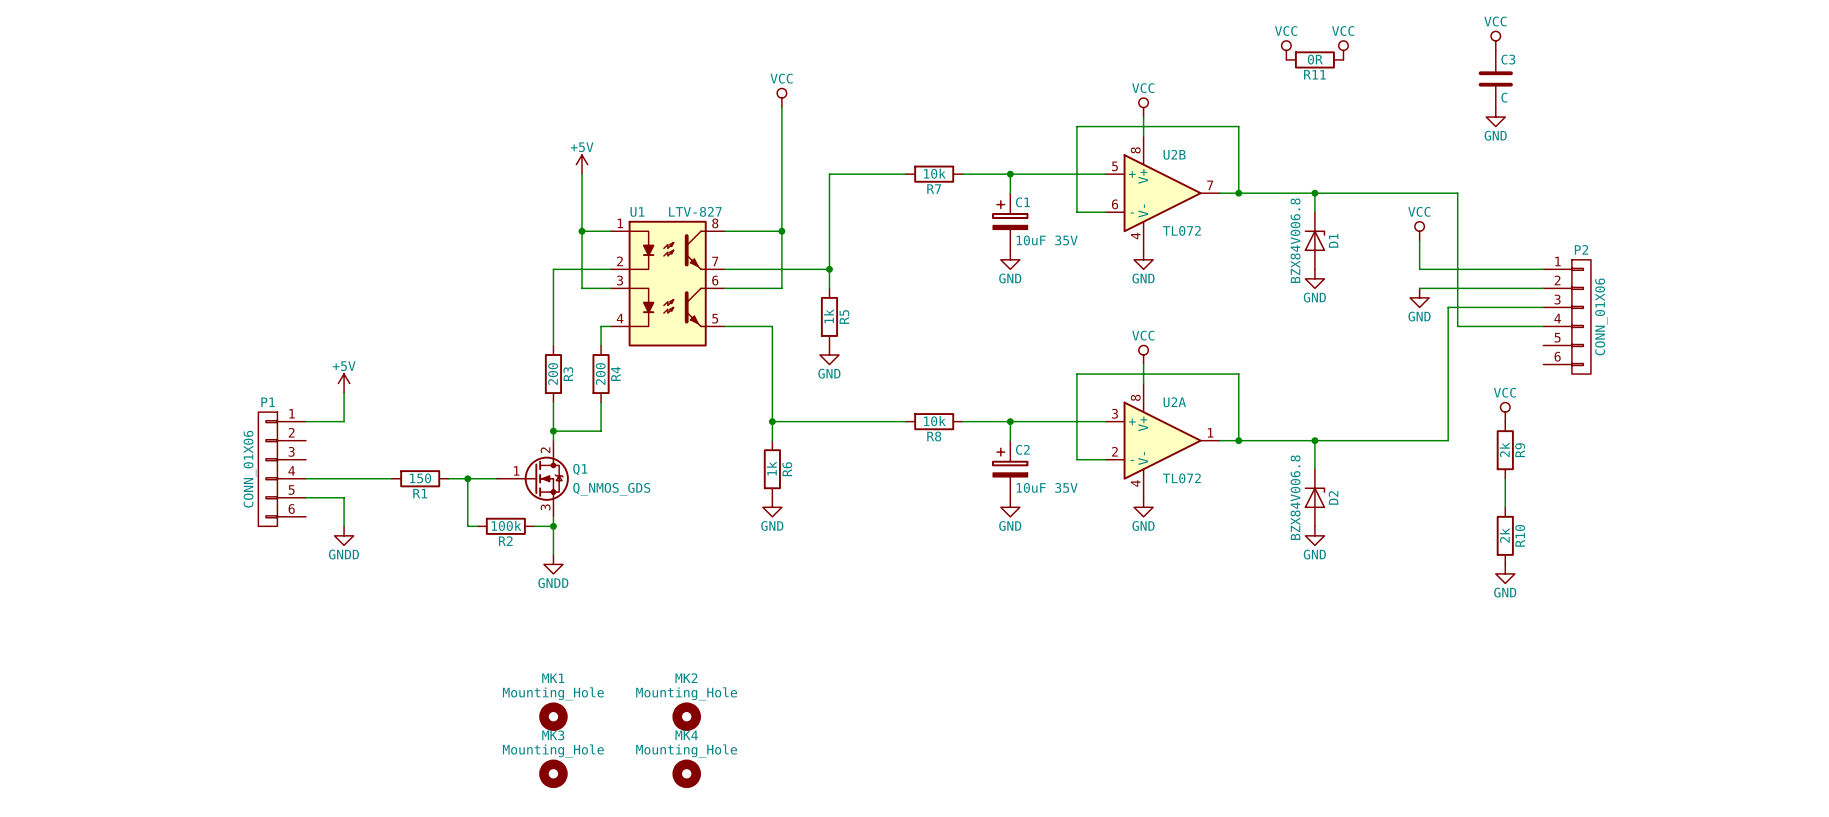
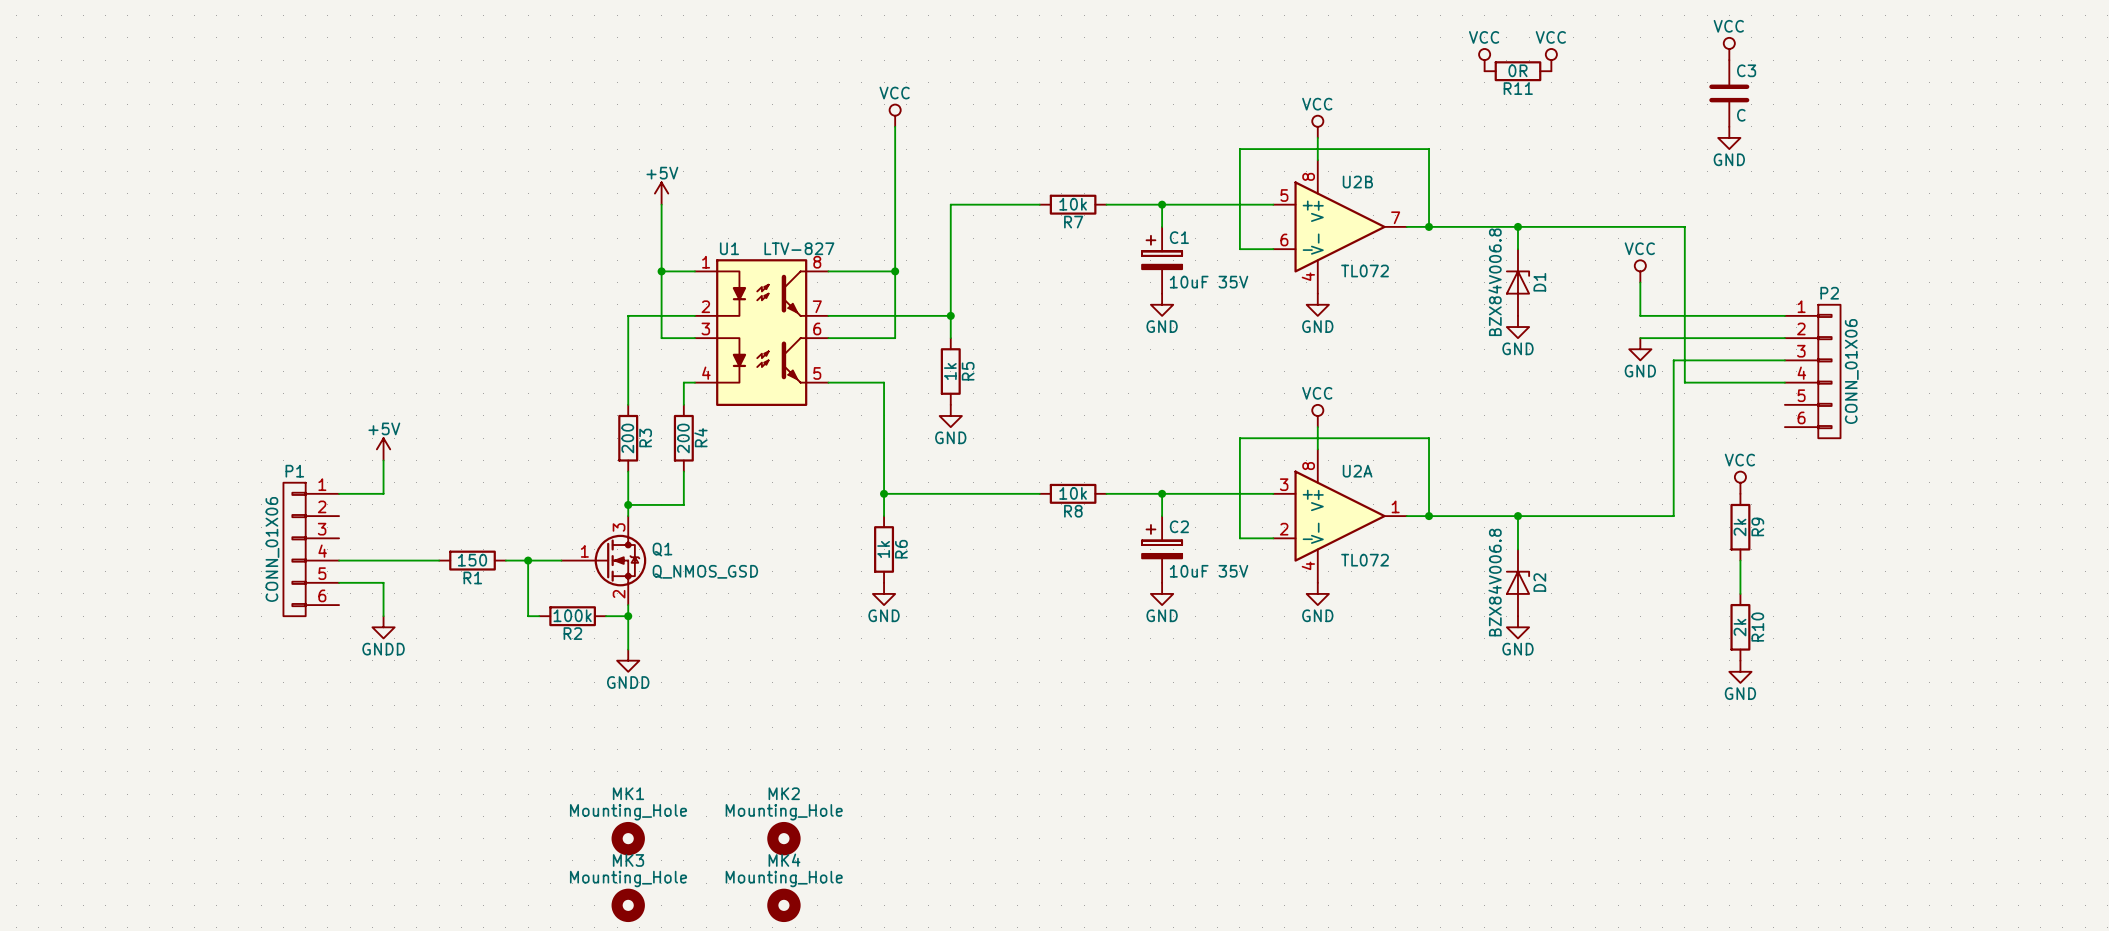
Q1 pin number: 2 (545, 450) -> 3 (619, 527)
Q1 value: Q_NMOS_GDS (611, 489) -> Q_NMOS_GSD (705, 571)
Q1 pin number: 3 (545, 507) -> 2 (619, 594)

